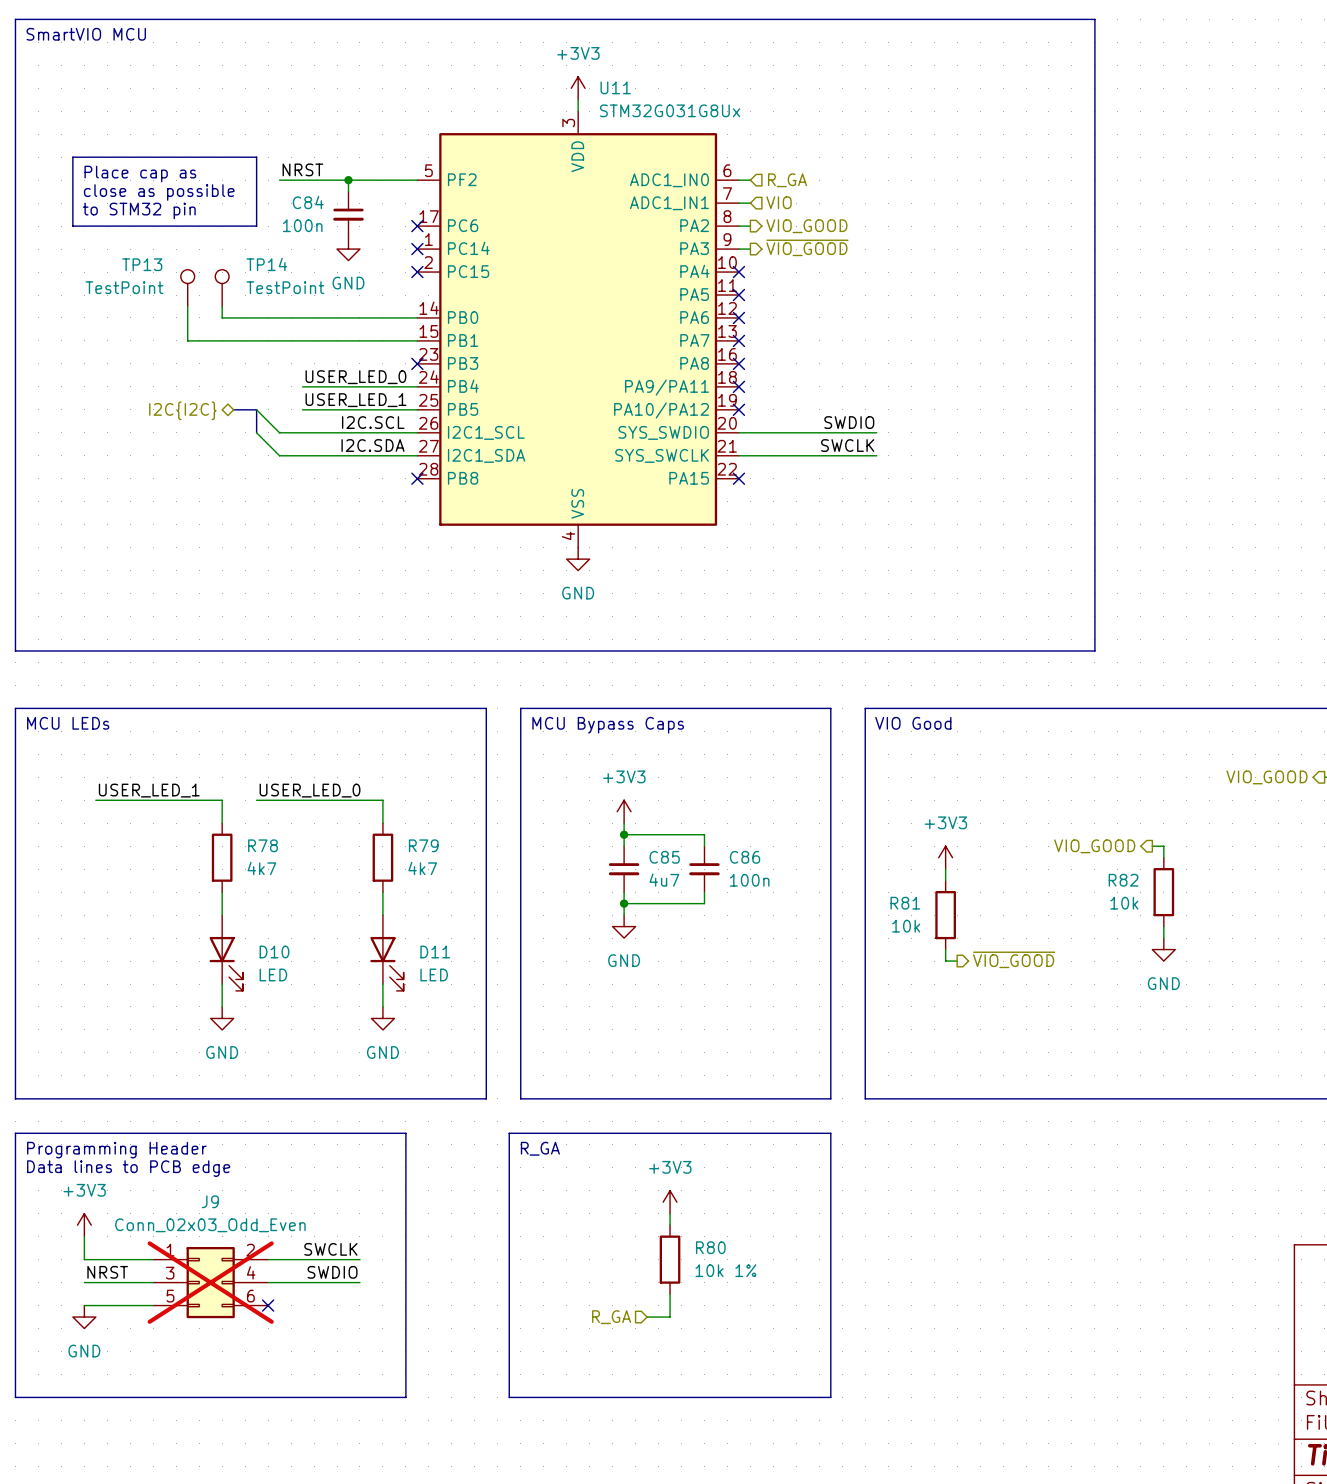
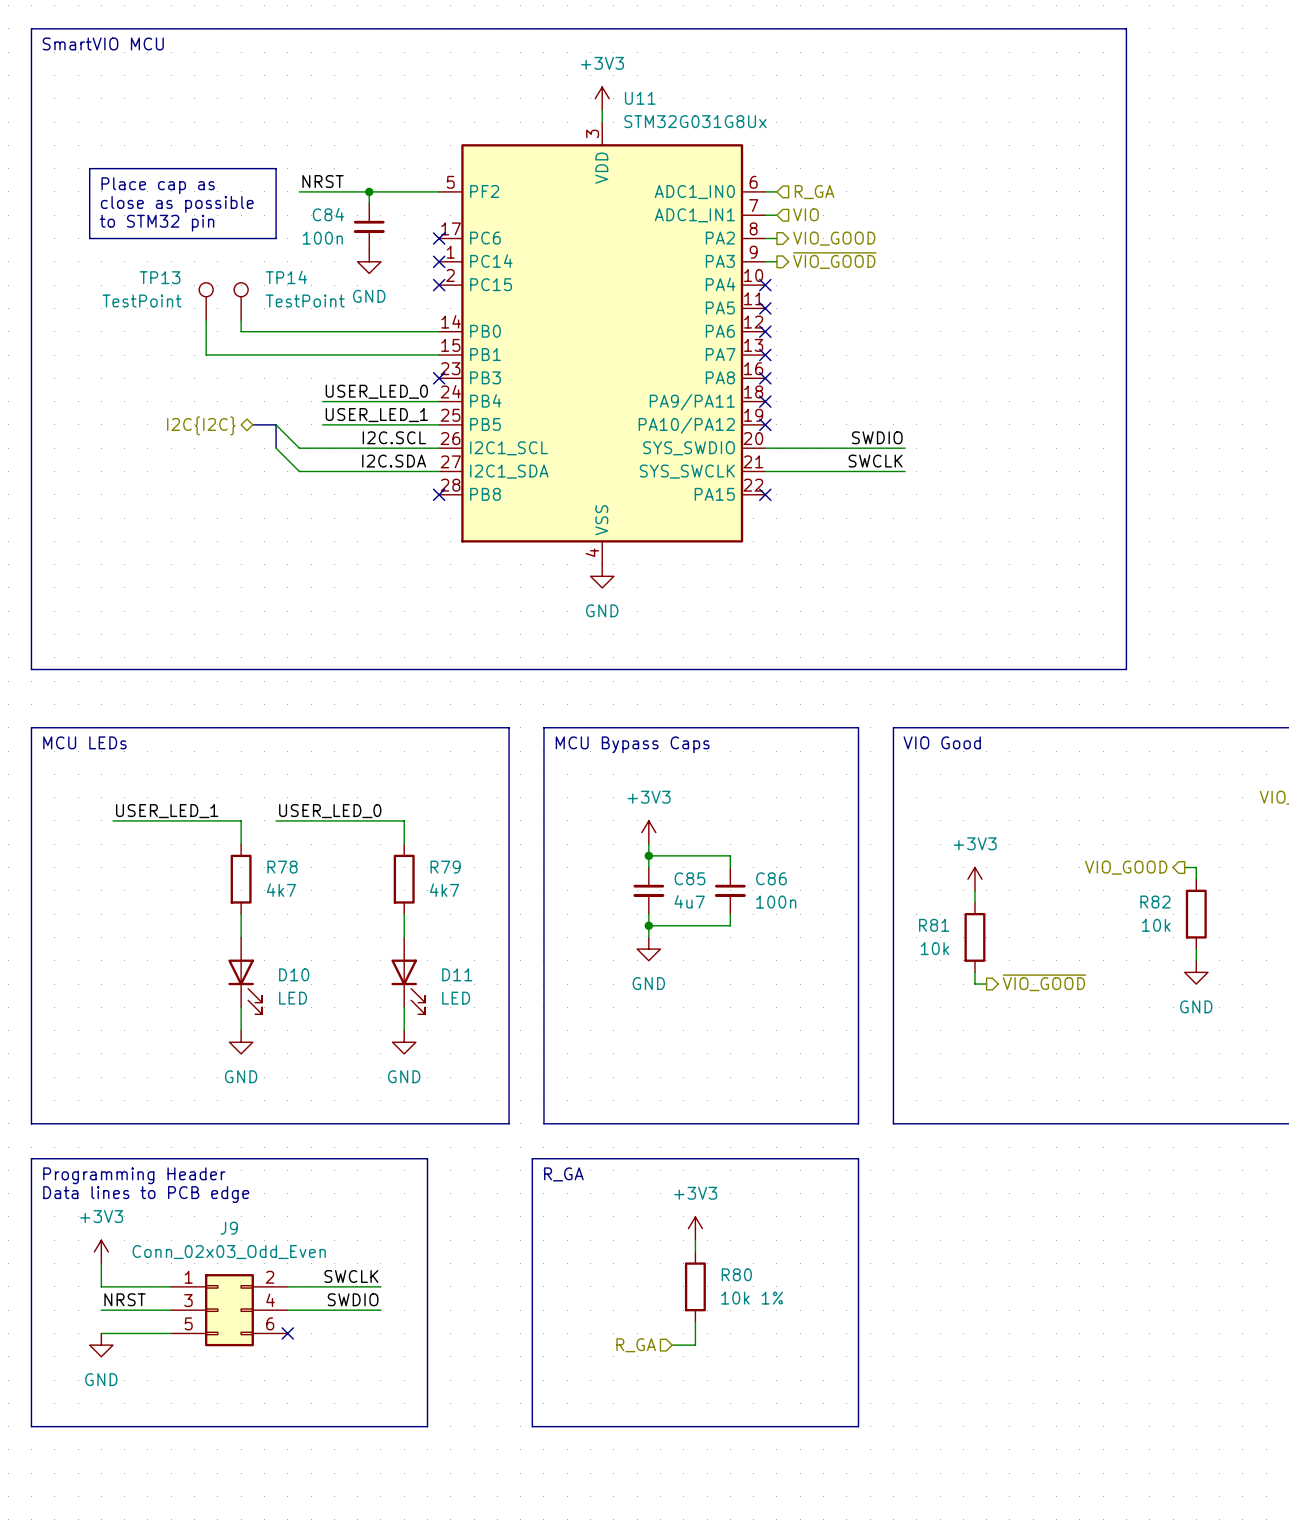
J9 do-not-place cross: (210, 1282) -> none

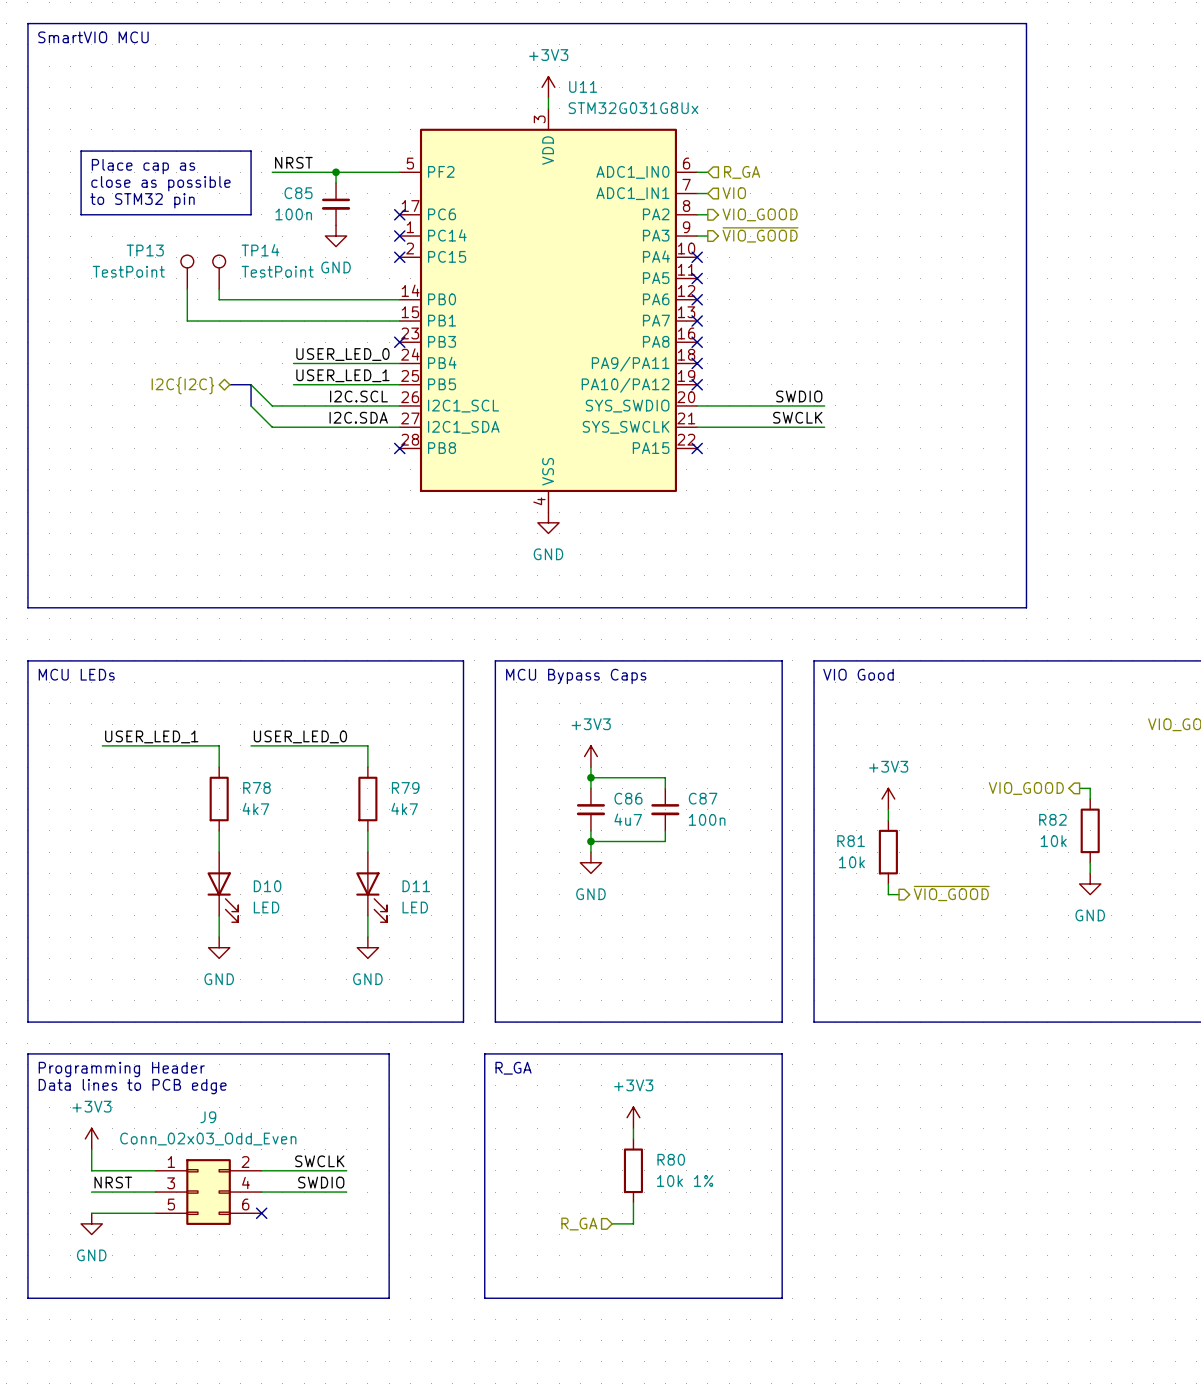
C84 name: C84 (328, 214) -> C85 (298, 193)
C85 name: C85 (689, 878) -> C86 (628, 798)
C86 name: C86 (771, 878) -> C87 (703, 798)

